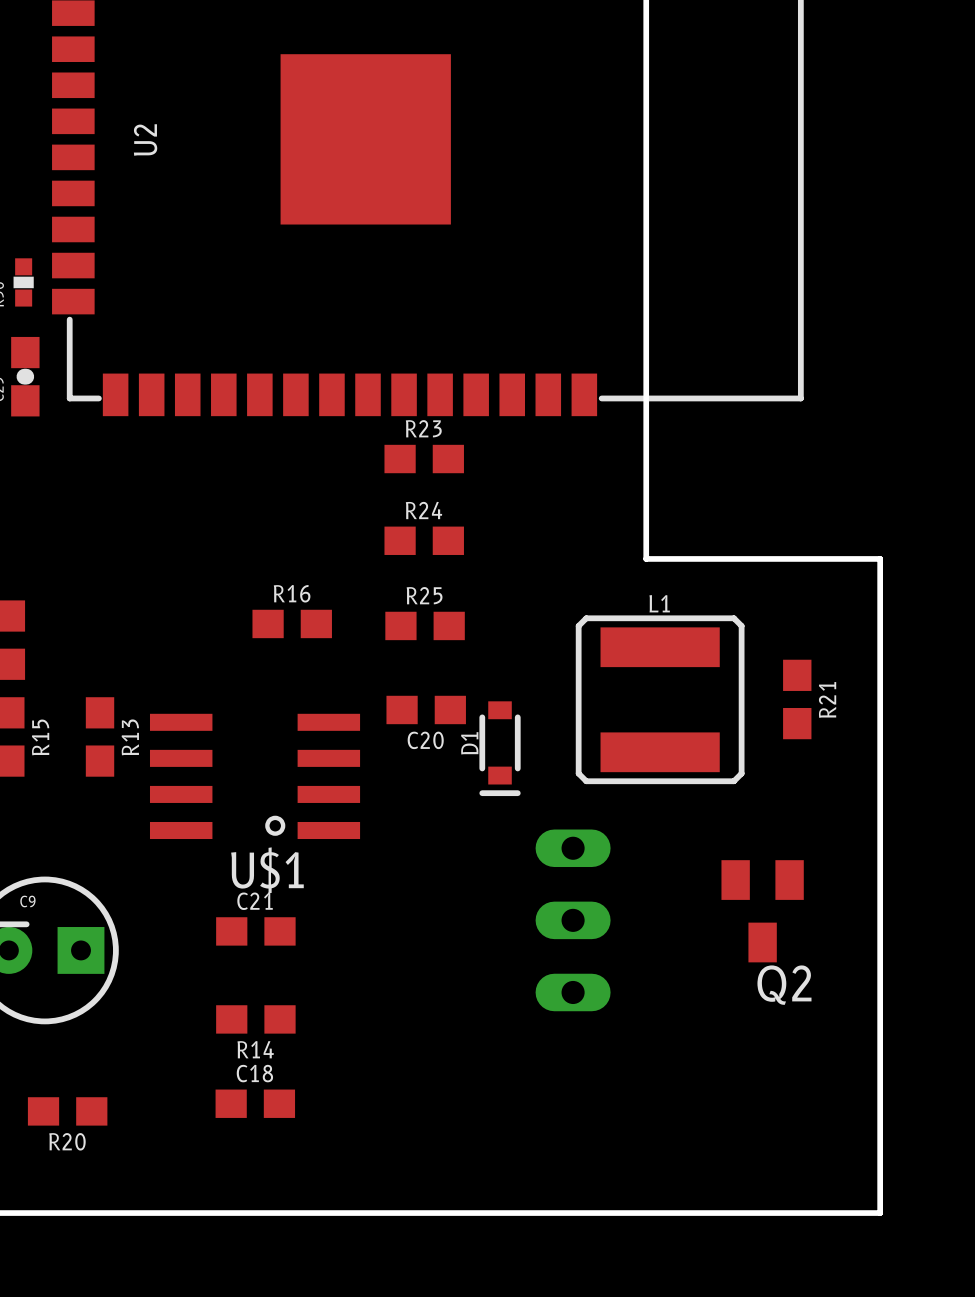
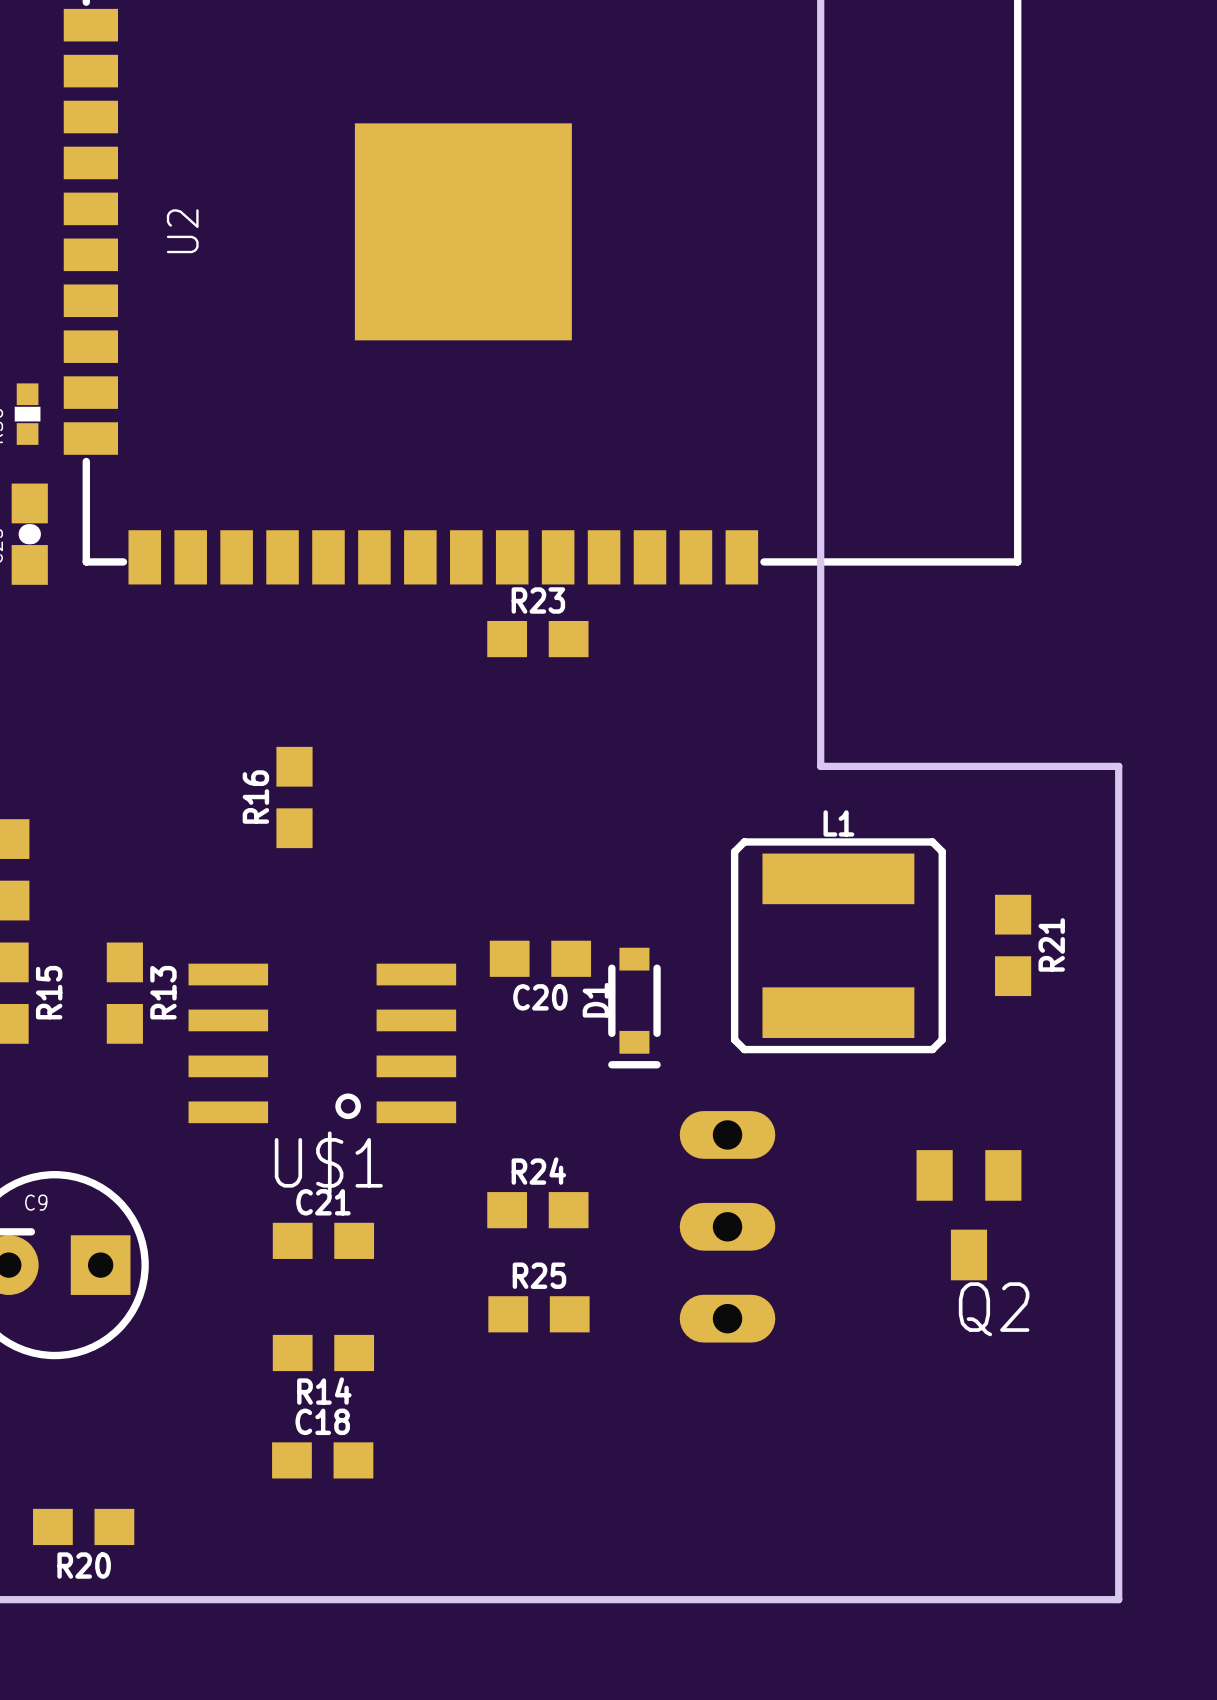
R24 position: (424, 540) -> (537, 1210)
R16 rotation: 0° (292, 623) -> 90° clockwise (294, 797)
R16 position: (292, 623) -> (294, 797)
R25 position: (425, 625) -> (538, 1314)
R20 position: (67, 1111) -> (83, 1526)

